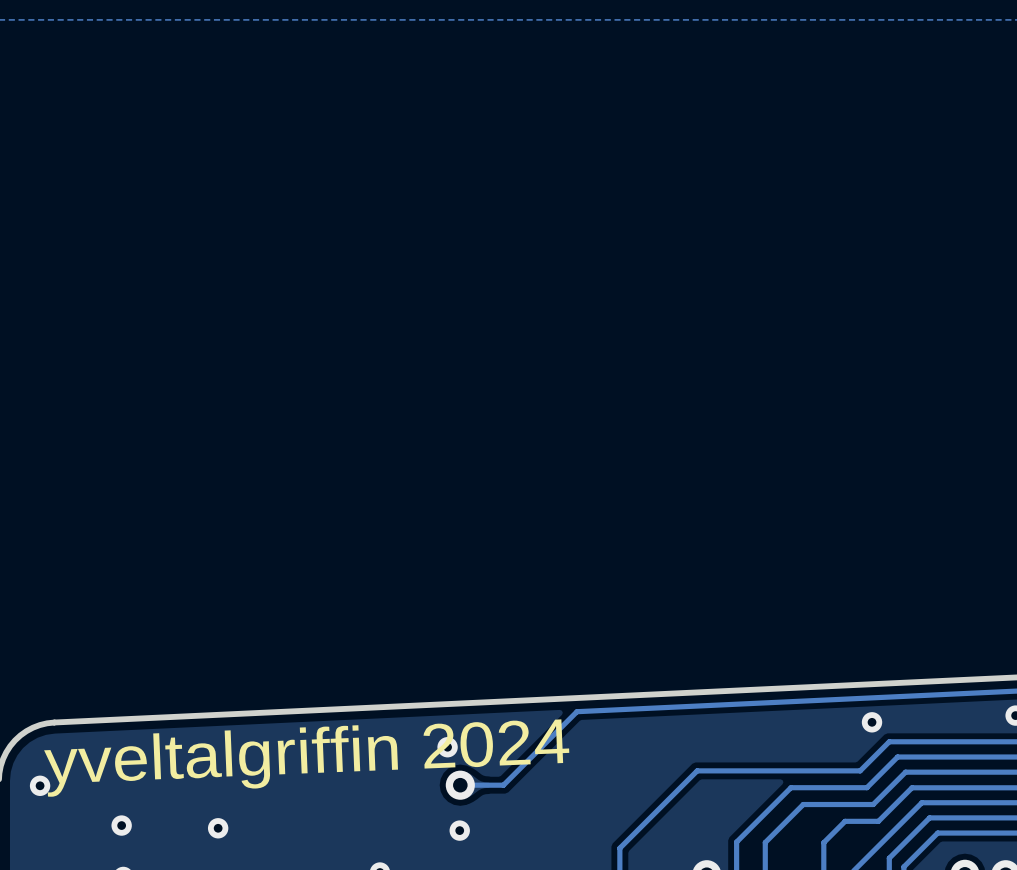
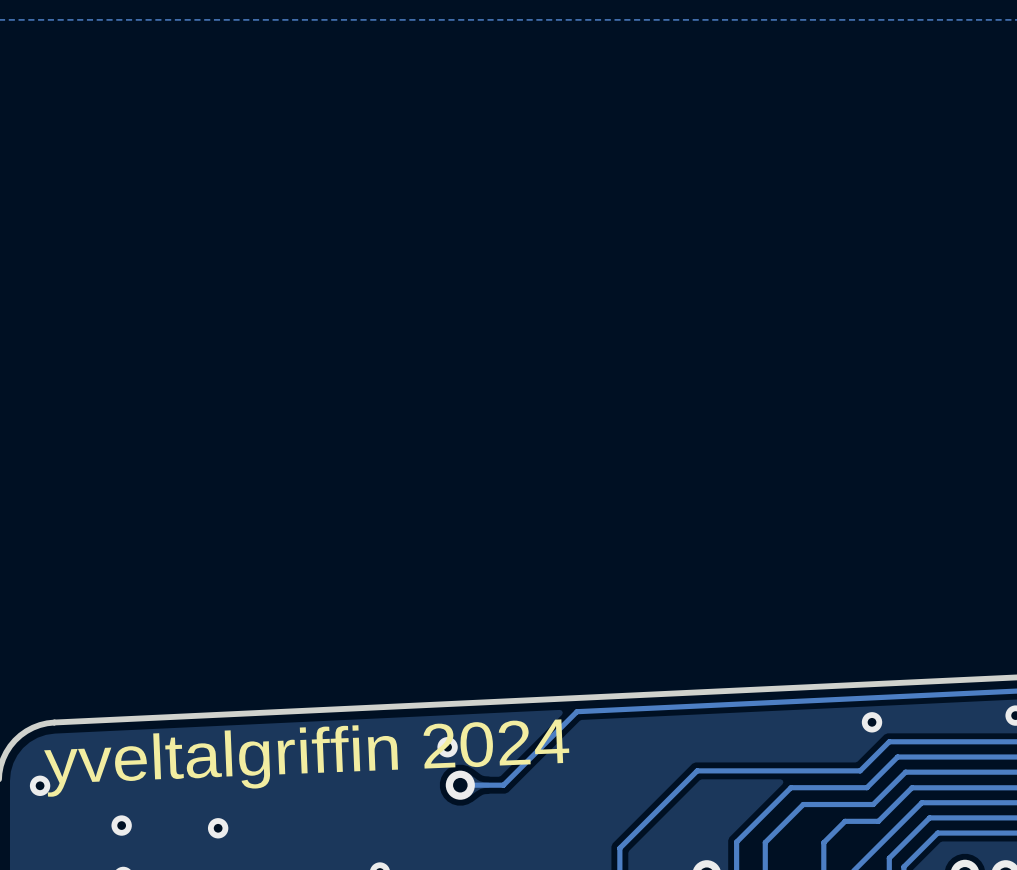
via: (459, 830) -> none

